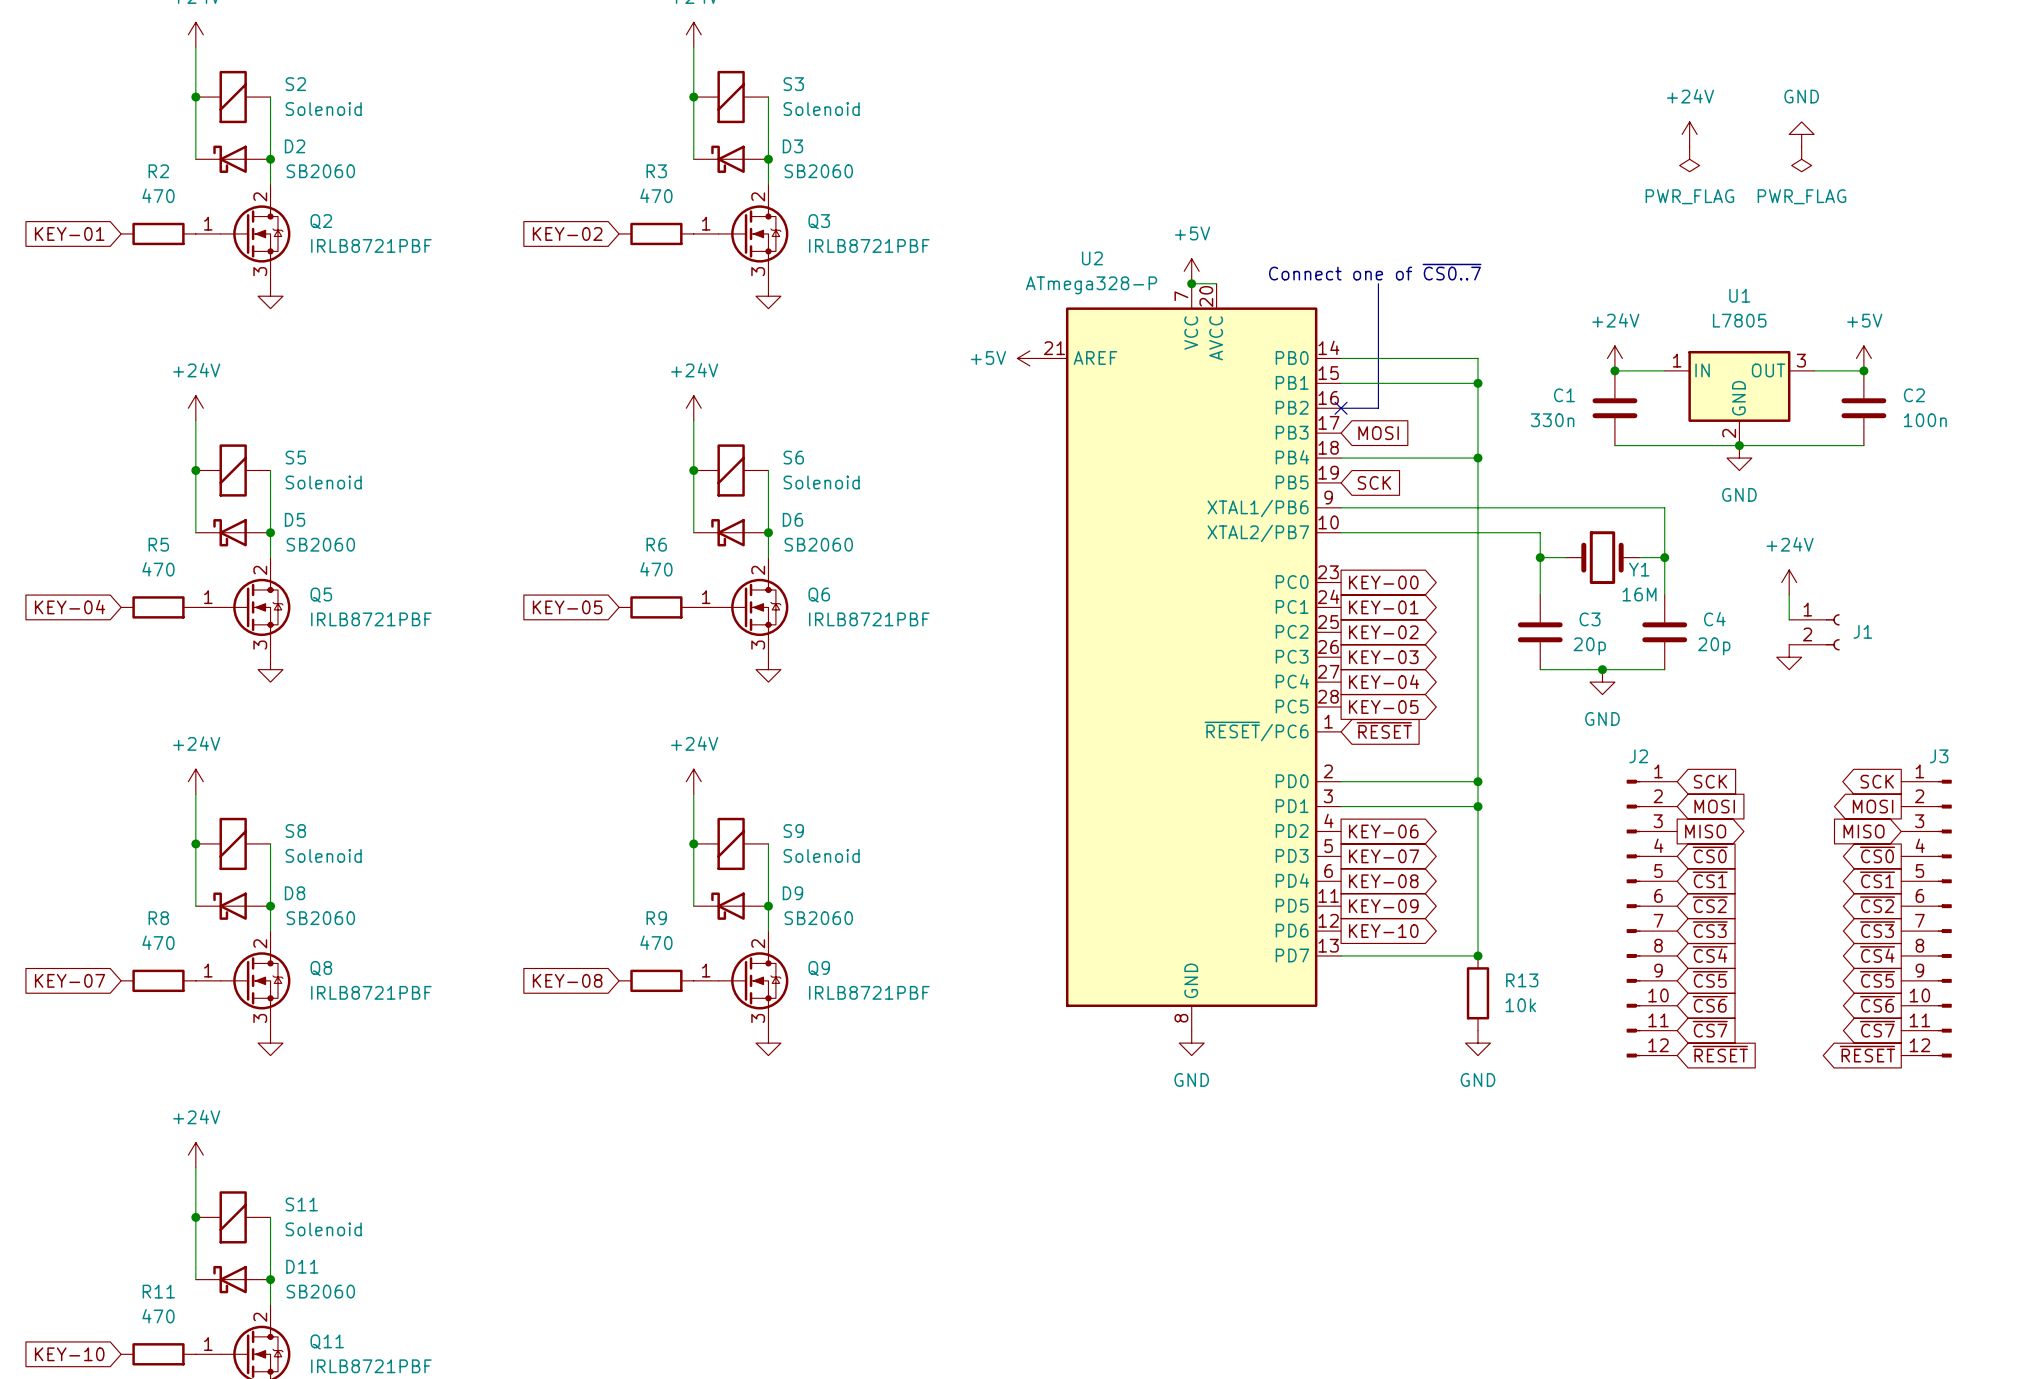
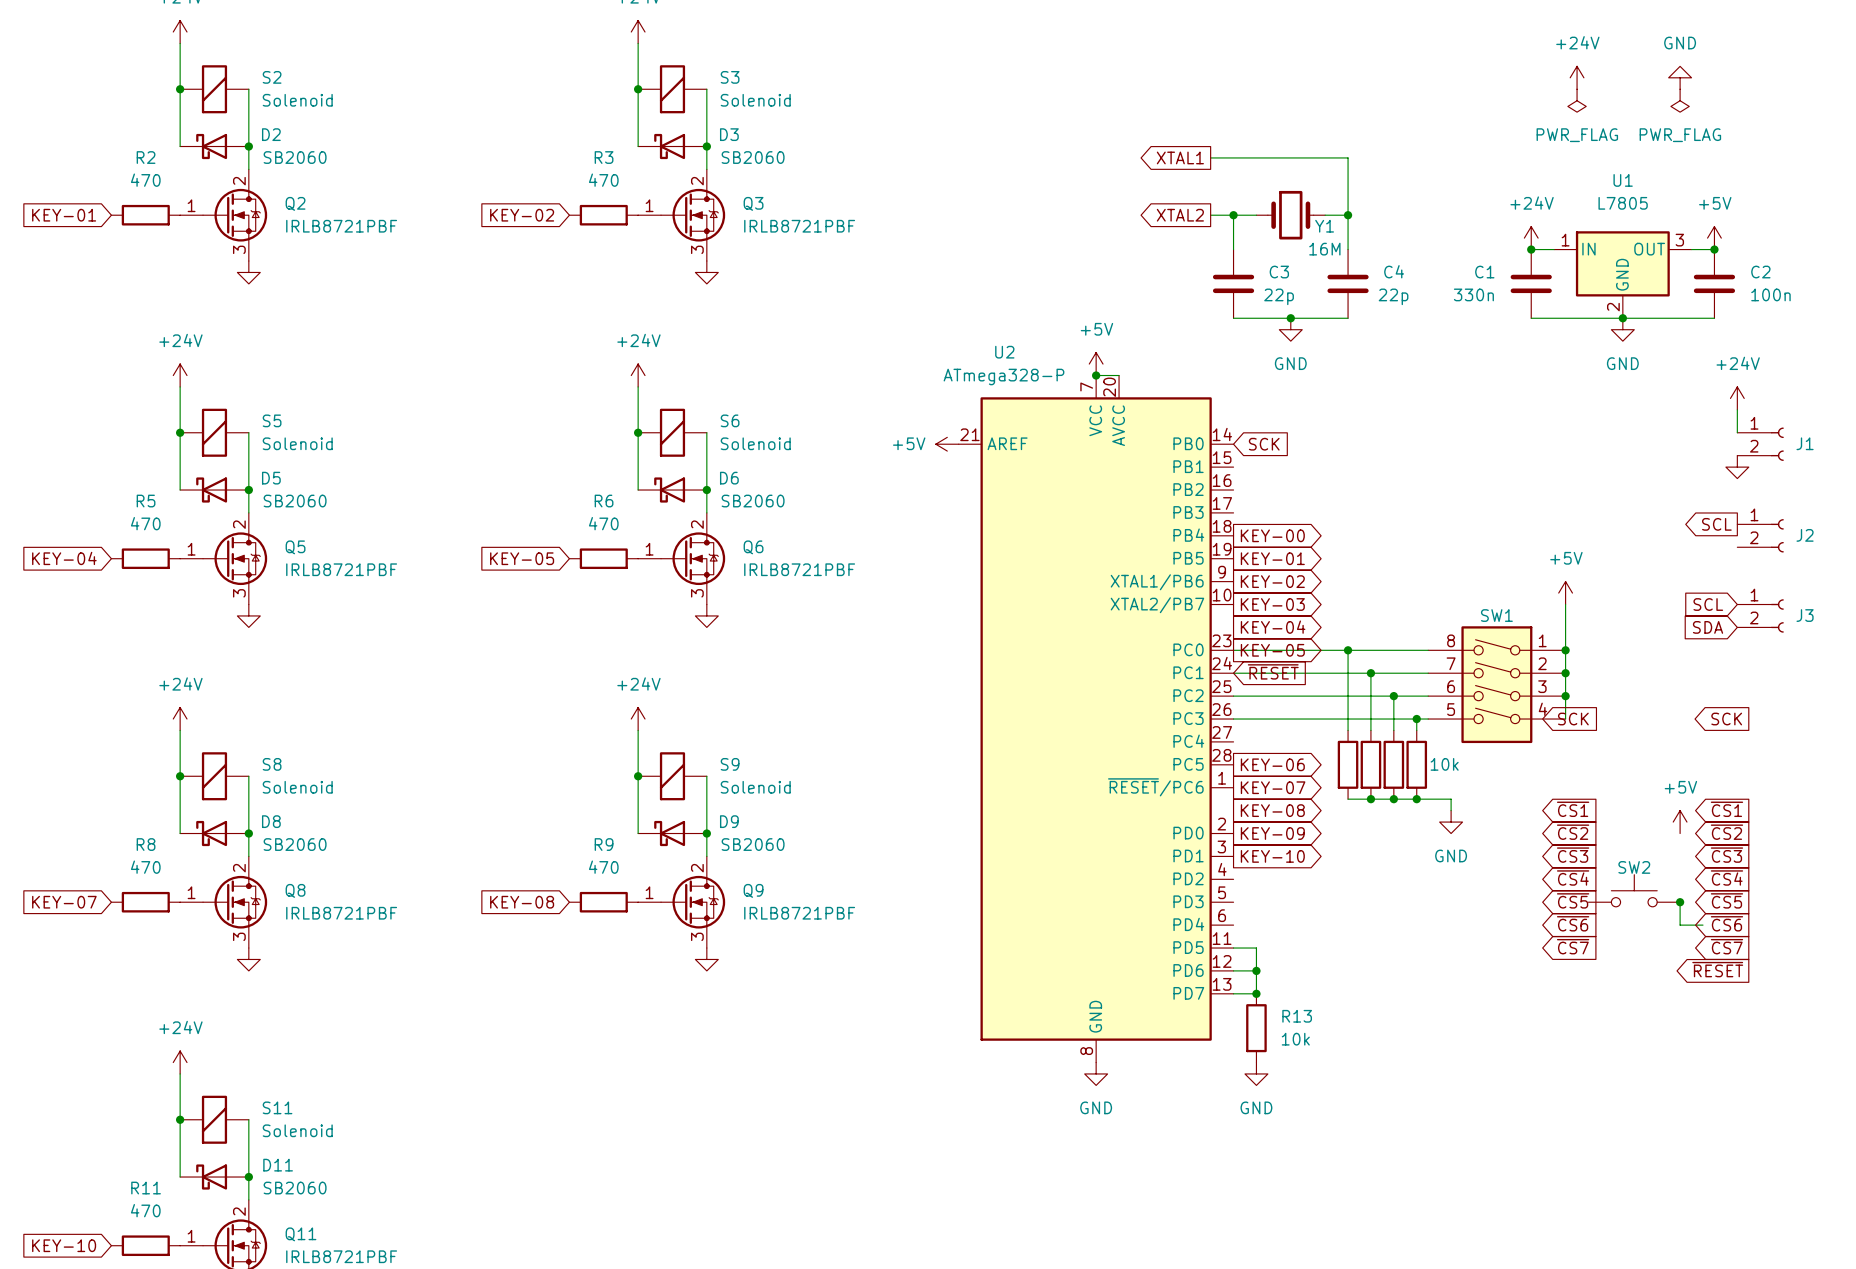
power symbol: none -> PWR_FLAG (1577, 100)
power symbol: none -> PWR_FLAG (1680, 100)
power symbol position: +24V (1689, 134) -> +24V (1577, 77)
power symbol position: GND (1801, 134) -> GND (1680, 77)
power symbol: PWR_FLAG (1689, 159) -> none
power symbol: PWR_FLAG (1801, 159) -> none
global label: none -> XTAL1 (1180, 157)
wire: none -> (1210, 157) (1348, 157) (1348, 249)
global label: none -> XTAL2 (1180, 215)
wire: none -> (1210, 215) (1256, 215)
wire: none -> (1233, 215) (1233, 249)
junction: none -> (1233, 215)
wire: none -> (1325, 215) (1348, 215)
junction: none -> (1348, 215)
power symbol: none -> +24V (1531, 238)
power symbol: +5V (1191, 271) -> none
wire: none -> (1531, 249) (1554, 249)
junction: none -> (1531, 249)
wire: none -> (1691, 249) (1714, 249)
junction: none -> (1714, 249)
text: Connect one of ~{CS0..7} (1375, 272) -> none
junction: (1191, 283) -> none
line: (1378, 283) (1378, 408) (1341, 408) -> none
wire: none -> (1233, 318) (1348, 318)
junction: none -> (1290, 318)
wire: none -> (1531, 318) (1714, 318)
junction: none -> (1622, 318)
power symbol: +5V (1029, 358) -> none
wire: (1341, 358) (1478, 358) (1478, 955) (1341, 955) -> none
power symbol: none -> GND (1290, 329)
power symbol: +24V (1614, 358) -> none
power symbol position: +5V (1863, 358) -> +5V (1714, 238)
wire: (1614, 370) (1664, 370) -> none
junction: (1614, 370) -> none
wire: (1814, 370) (1863, 370) -> none
junction: (1863, 370) -> none
wire: (1341, 383) (1478, 383) -> none
junction: (1478, 383) -> none
power symbol: none -> +5V (1096, 364)
U1 position: (1739, 398) -> (1622, 274)
junction: none -> (1096, 375)
no-connect mark: (1341, 408) -> none
C1 position: (1614, 408) -> (1531, 283)
C2 position: (1863, 408) -> (1714, 283)
global label: MOSI (1378, 433) -> none
power symbol: none -> +24V (1737, 398)
wire: (1614, 445) (1863, 445) -> none
junction: (1739, 445) -> none
wire: (1341, 458) (1478, 458) -> none
junction: (1478, 458) -> none
power symbol position: GND (1739, 458) -> GND (1622, 329)
power symbol: none -> +5V (947, 444)
wire: (1341, 507) (1664, 507) (1664, 594) -> none
wire: (1341, 532) (1540, 532) (1540, 594) -> none
wire: (1540, 557) (1565, 557) -> none
junction: (1540, 557) -> none
Y1 position: (1602, 557) -> (1290, 215)
wire: (1639, 557) (1664, 557) -> none
junction: (1664, 557) -> none
global label: none -> SCL (1716, 524)
power symbol: +24V (1789, 582) -> none
wire: (1789, 594) (1789, 619) -> (1737, 409) (1737, 432)
C3 position: (1540, 632) -> (1233, 283)
C4 position: (1664, 632) -> (1348, 283)
J1 position: (1814, 632) -> (1760, 444)
power symbol: none -> +5V (1565, 593)
C3 value: 20p (1589, 646) -> 22p (1279, 296)
C4 value: 20p (1714, 646) -> 22p (1393, 296)
U2 position: (1191, 657) -> (1096, 719)
wire: none -> (1565, 604) (1565, 719)
power symbol position: (1789, 657) -> (1737, 467)
global label: none -> SCL (1708, 604)
wire: (1540, 669) (1664, 669) -> none
junction: (1602, 669) -> none
power symbol: GND (1602, 682) -> none
global label: none -> SDA (1708, 627)
wire: none -> (1233, 650) (1428, 650)
wire: none -> (1348, 650) (1348, 730)
junction: none -> (1348, 650)
junction: none -> (1565, 650)
wire: none -> (1233, 673) (1428, 673)
wire: none -> (1370, 673) (1370, 730)
junction: none -> (1370, 673)
junction: none -> (1565, 673)
SW1: none -> (1496, 684)
wire: none -> (1233, 696) (1428, 696)
wire: none -> (1393, 696) (1393, 730)
junction: none -> (1393, 696)
J2 name position: J2 (1638, 756) -> J2 (1805, 535)
junction: none -> (1565, 696)
J3 name position: J3 (1939, 756) -> J3 (1805, 615)
J2 symbol: [1626, 779, 1678, 1058] -> [1737, 519, 1784, 553]
J3 symbol: [1901, 779, 1952, 1058] -> [1737, 599, 1784, 633]
wire: none -> (1359, 719) (1428, 719)
junction: (1478, 781) -> none
wire: none -> (1416, 719) (1416, 730)
junction: none -> (1416, 719)
wire: (1341, 806) (1478, 806) -> none
junction: (1478, 806) -> none
global label: MOSI (1714, 806) -> none
global label: MOSI (1873, 806) -> none
part: none -> (1348, 764)
part: none -> (1370, 764)
part: none -> (1393, 764)
part: none -> 10k (1416, 764)
global label: MISO (1705, 831) -> none
global label: MISO (1864, 831) -> none
global label: ~{CS0} (1710, 854) -> none
global label: ~{CS0} (1877, 854) -> none
wire: none -> (1348, 799) (1451, 799) (1451, 810)
junction: none -> (1370, 799)
junction: none -> (1393, 799)
junction: none -> (1416, 799)
power symbol: none -> GND (1451, 822)
power symbol: none -> +5V (1680, 822)
junction: (1478, 955) -> none
SW2: none -> (1634, 890)
wire: none -> (1680, 902) (1680, 925) (1702, 925)
junction: none -> (1680, 902)
R13 position: (1478, 993) -> (1256, 1028)
wire: none -> (1233, 948) (1256, 948) (1256, 993) (1233, 993)
power symbol: GND (1191, 1043) -> none
power symbol: GND (1478, 1043) -> none
global label: ~{RESET} (1720, 1054) -> none
wire: none -> (1233, 970) (1256, 970)
junction: none -> (1256, 970)
junction: none -> (1256, 993)
power symbol: none -> GND (1096, 1073)
power symbol: none -> GND (1256, 1073)

